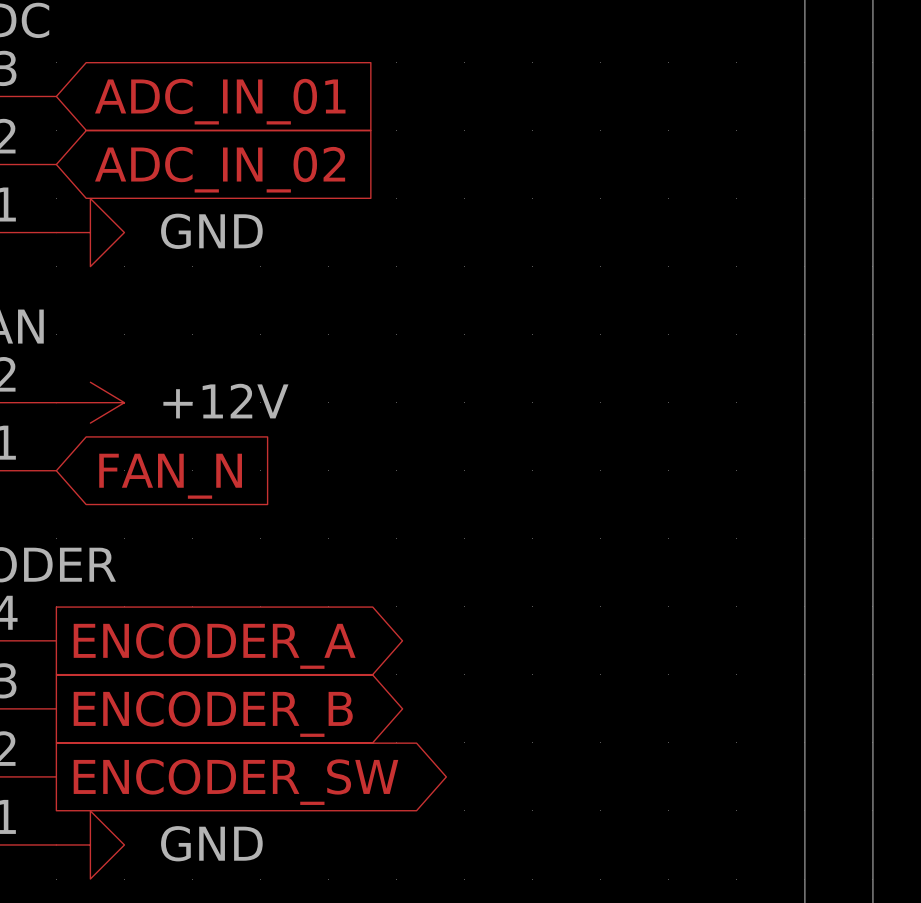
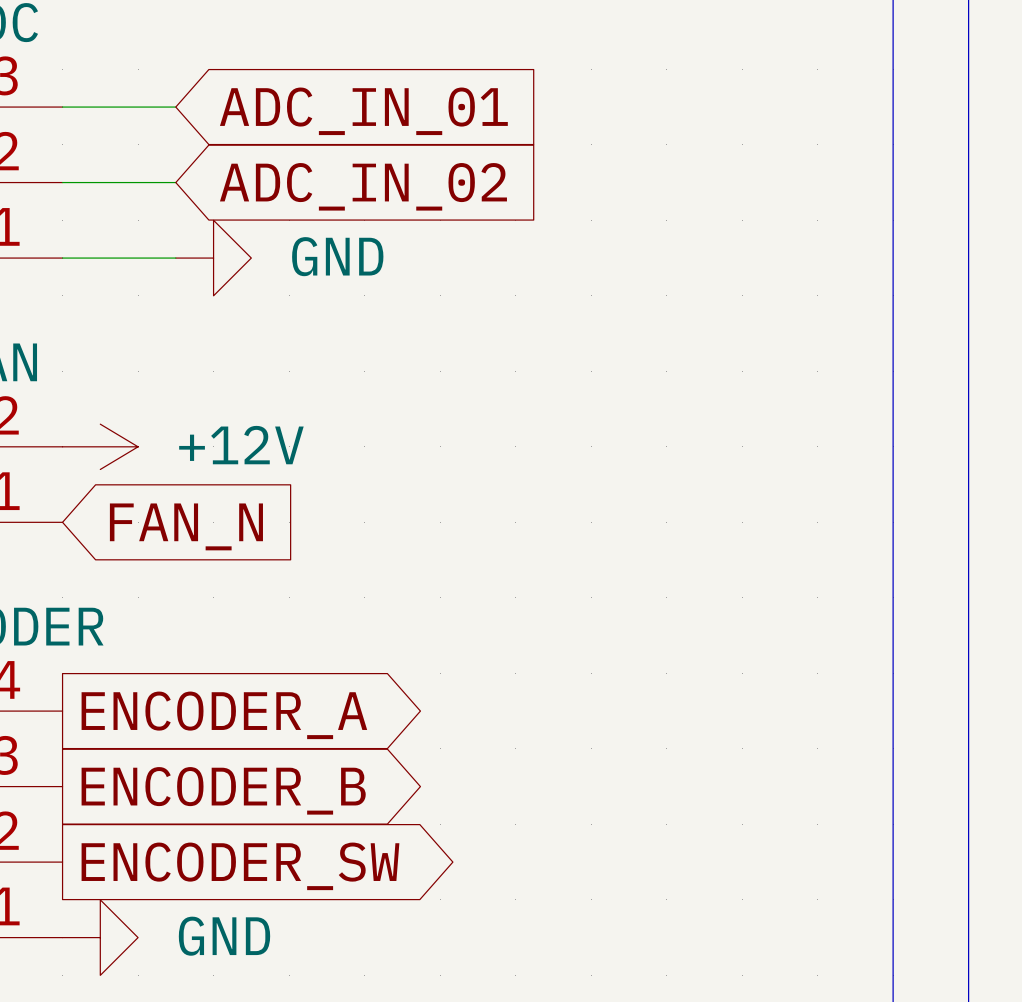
wire: none -> (62, 107) (175, 107)
global label position: ADC_IN_01 (220, 101) -> ADC_IN_01 (363, 111)
wire: none -> (62, 182) (175, 182)
global label position: ADC_IN_02 (220, 169) -> ADC_IN_02 (363, 186)
wire: none -> (62, 258) (175, 258)
power symbol position: GND (90, 232) -> GND (213, 258)

